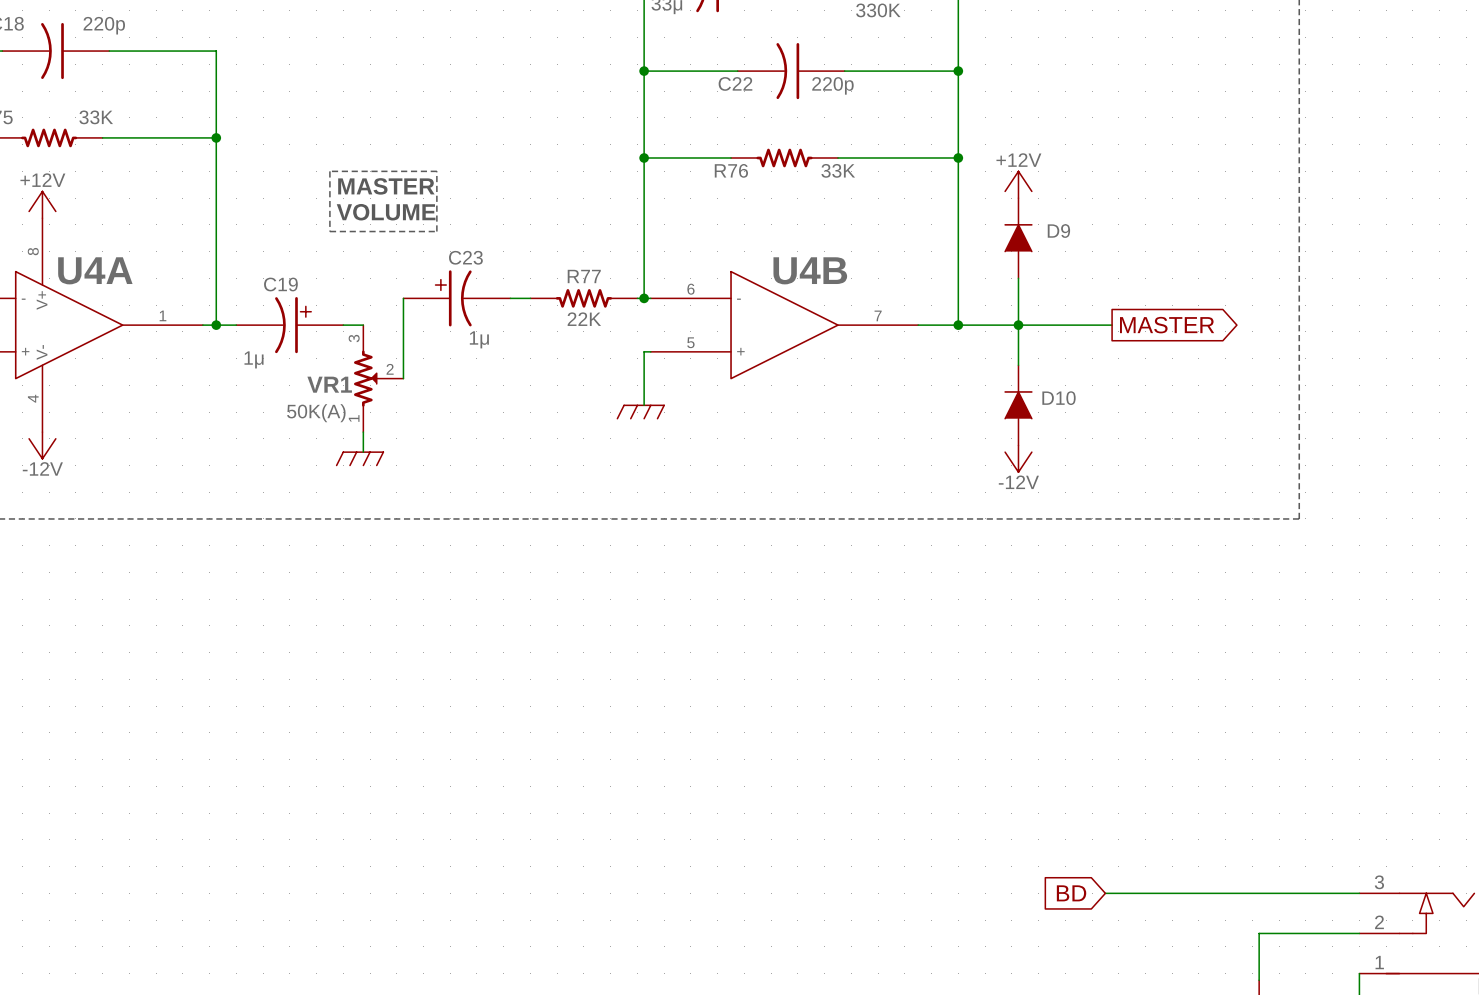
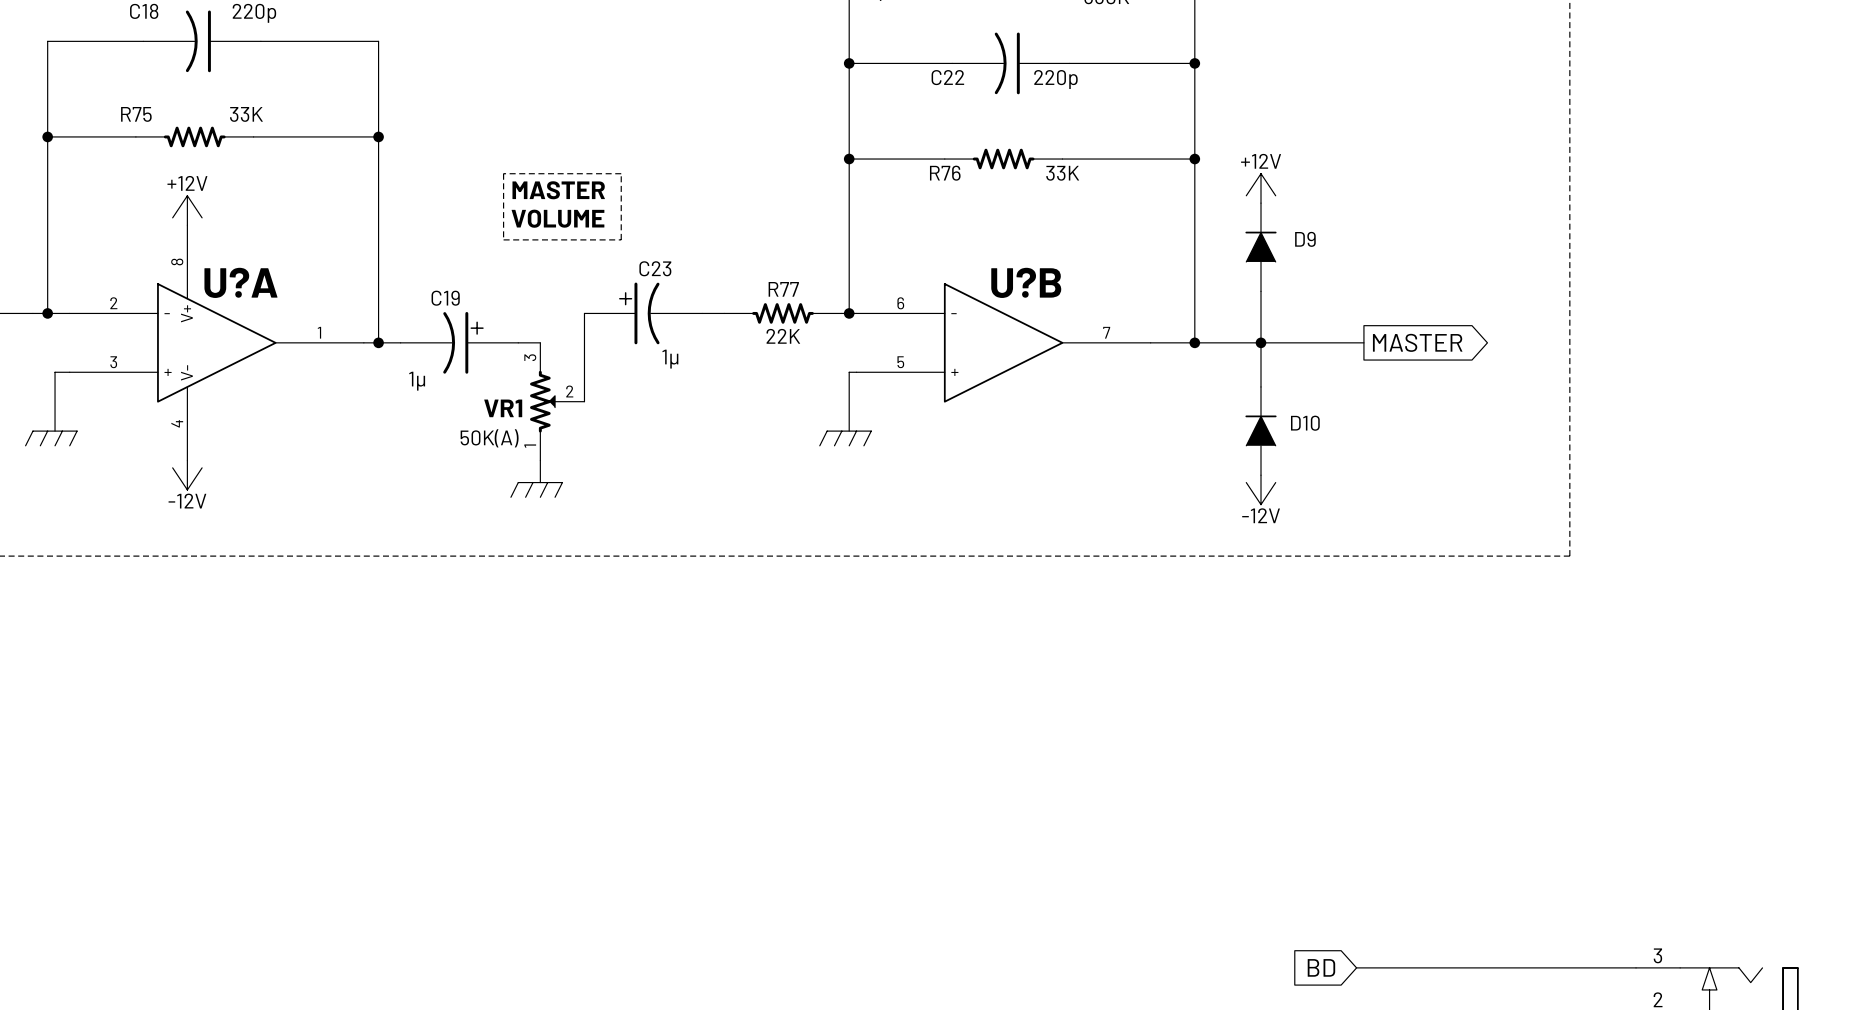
U4A name: U4A (95, 270) -> U?A (240, 282)
U4B name: U4B (810, 270) -> U?B (1026, 282)

